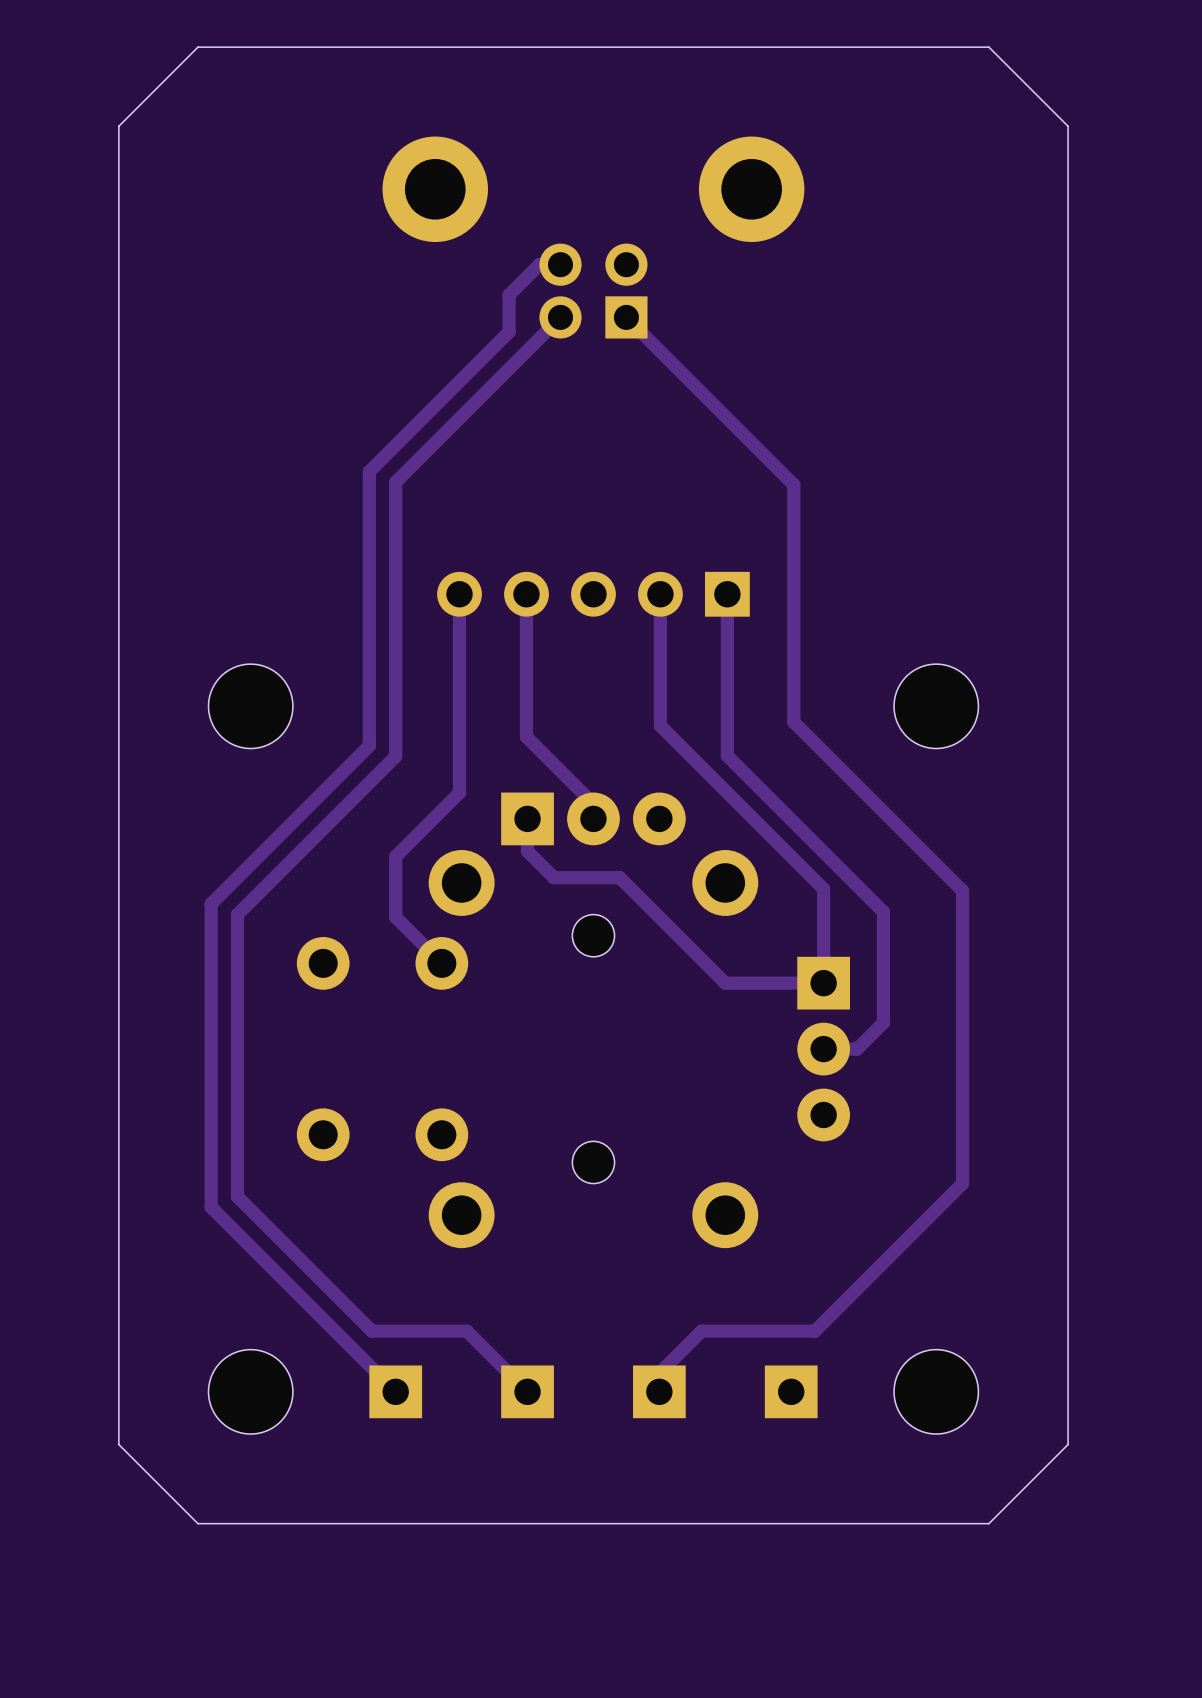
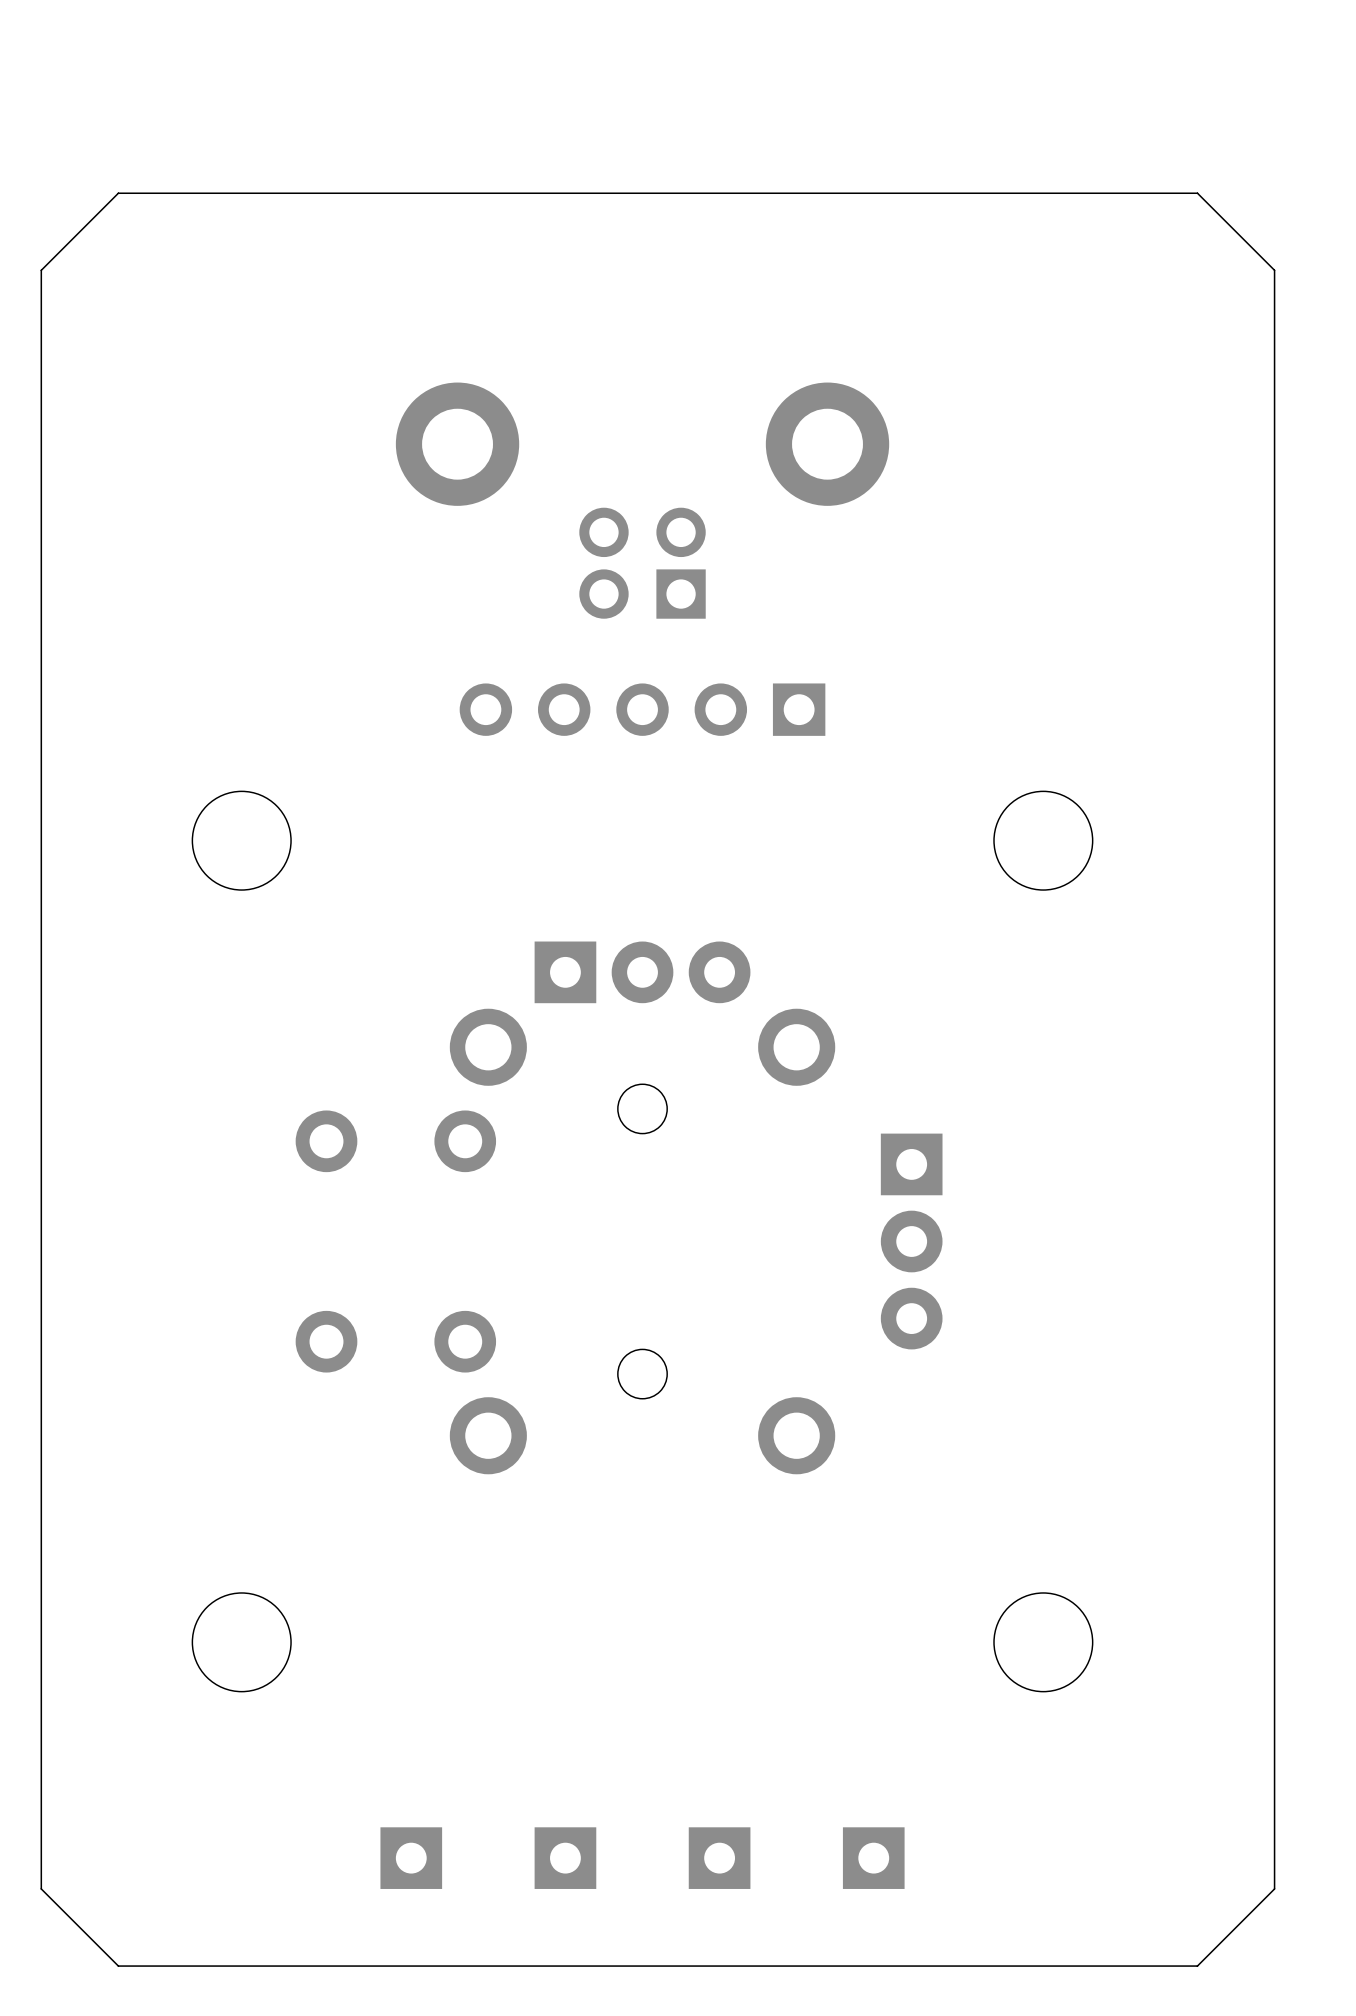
board edge: (988, 47) (1068, 126) (1068, 1444) (988, 1523) (197, 1523) (118, 1444) (118, 126) (197, 47) (988, 47) -> (1197, 193) (1274, 270) (1274, 1888) (1197, 1966) (118, 1966) (41, 1888) (41, 270) (118, 193) (1197, 193)
part position: (593, 237) -> (642, 500)
track: (560, 264) (539, 264) (509, 295) (509, 331) (369, 471) (369, 745) (211, 904) (211, 1207) (395, 1391) -> none
track: (560, 317) (395, 482) (395, 756) (237, 914) (237, 1196) (371, 1331) (466, 1331) (527, 1391) -> none
track: (626, 317) (793, 484) (793, 722) (962, 890) (962, 1183) (814, 1331) (701, 1331) (659, 1373) (659, 1391) -> none
track: (459, 594) (459, 792) (395, 856) (395, 917) (441, 963) -> none
track: (526, 594) (526, 736) (593, 803) (593, 818) -> none
track: (660, 594) (660, 725) (823, 889) (823, 983) (725, 983) (619, 877) (553, 877) (527, 851) (527, 818) -> none
track: (727, 594) (727, 755) (883, 911) (883, 1022) (857, 1049) (823, 1049) -> none
part: (395, 1391) -> none
part: (527, 1391) -> none
part: (659, 1391) -> none
part: (791, 1391) -> none
part: none -> (411, 1858)
part: none -> (565, 1858)
part: none -> (719, 1858)
part: none -> (873, 1858)

